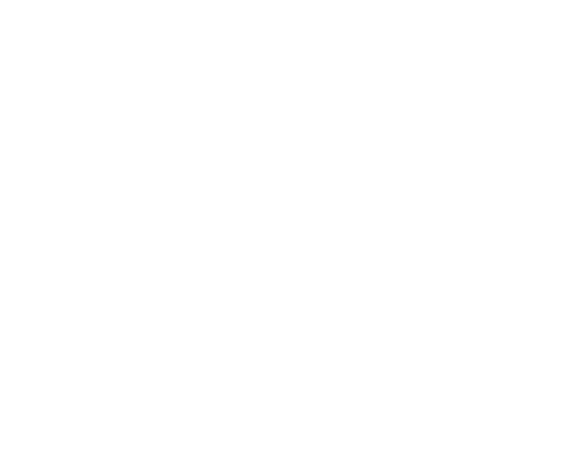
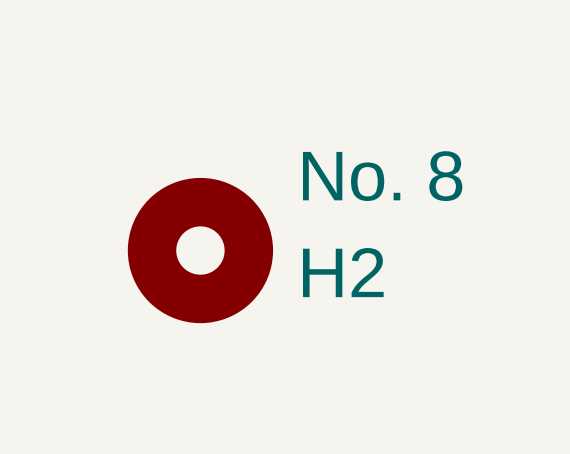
H2: none -> No. 8 (200, 250)

